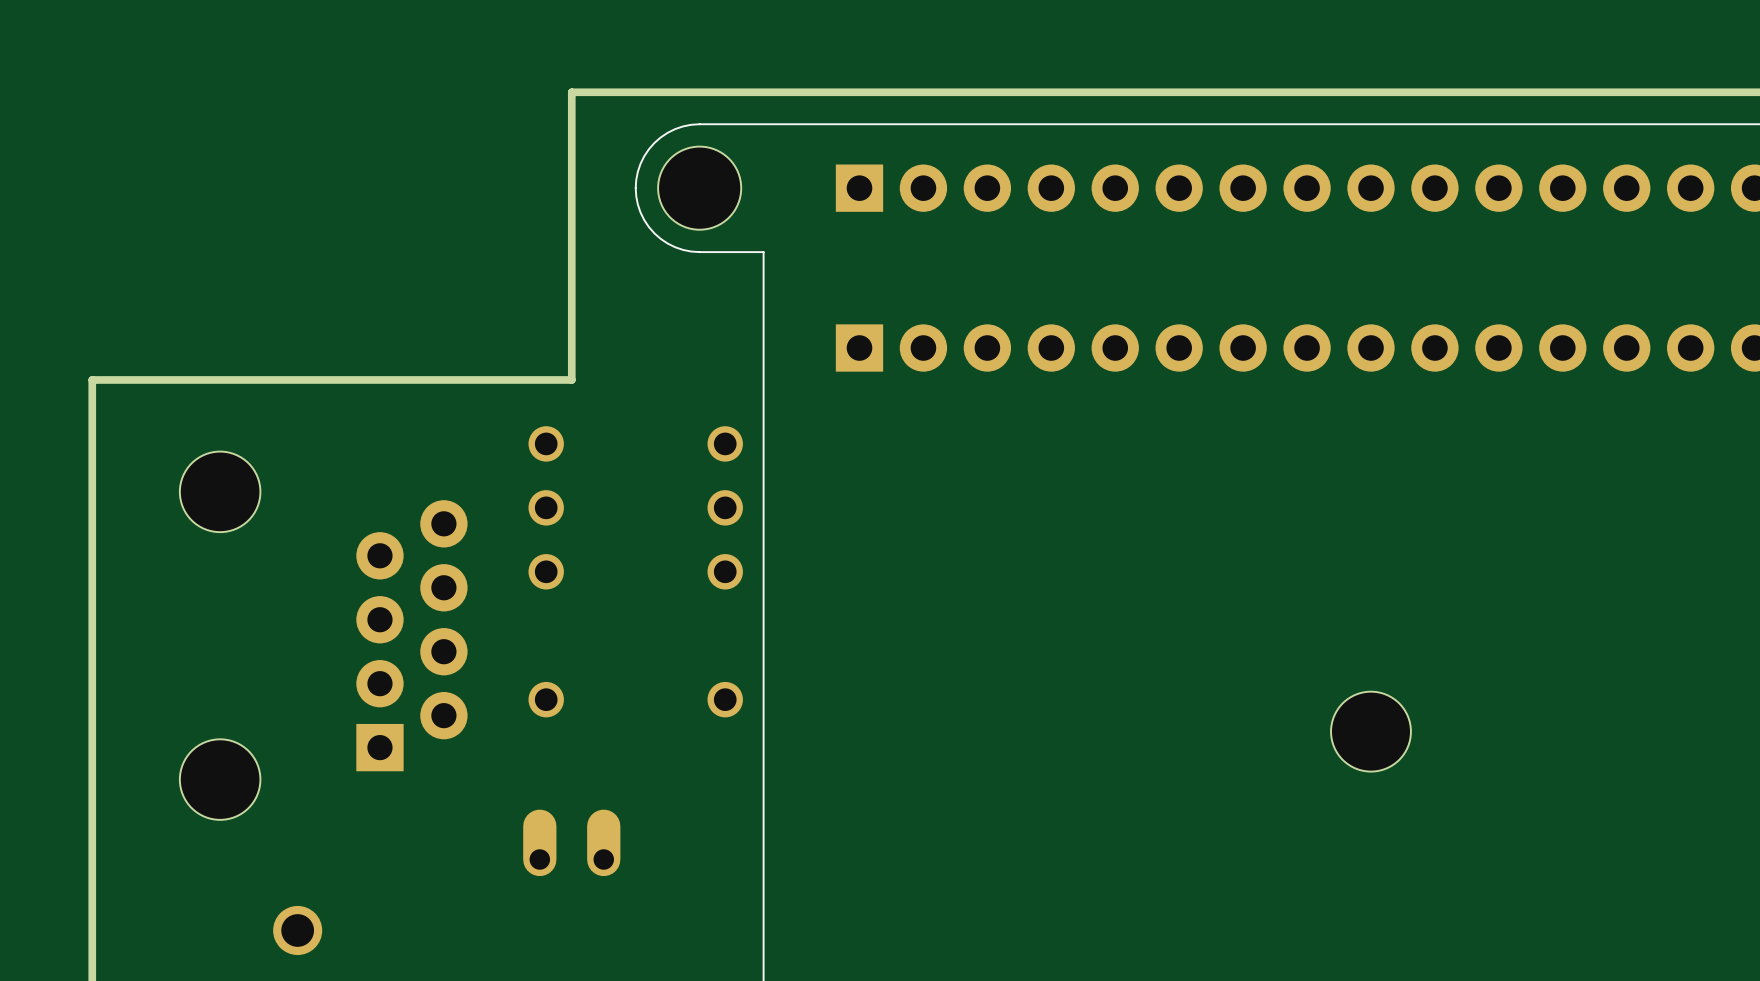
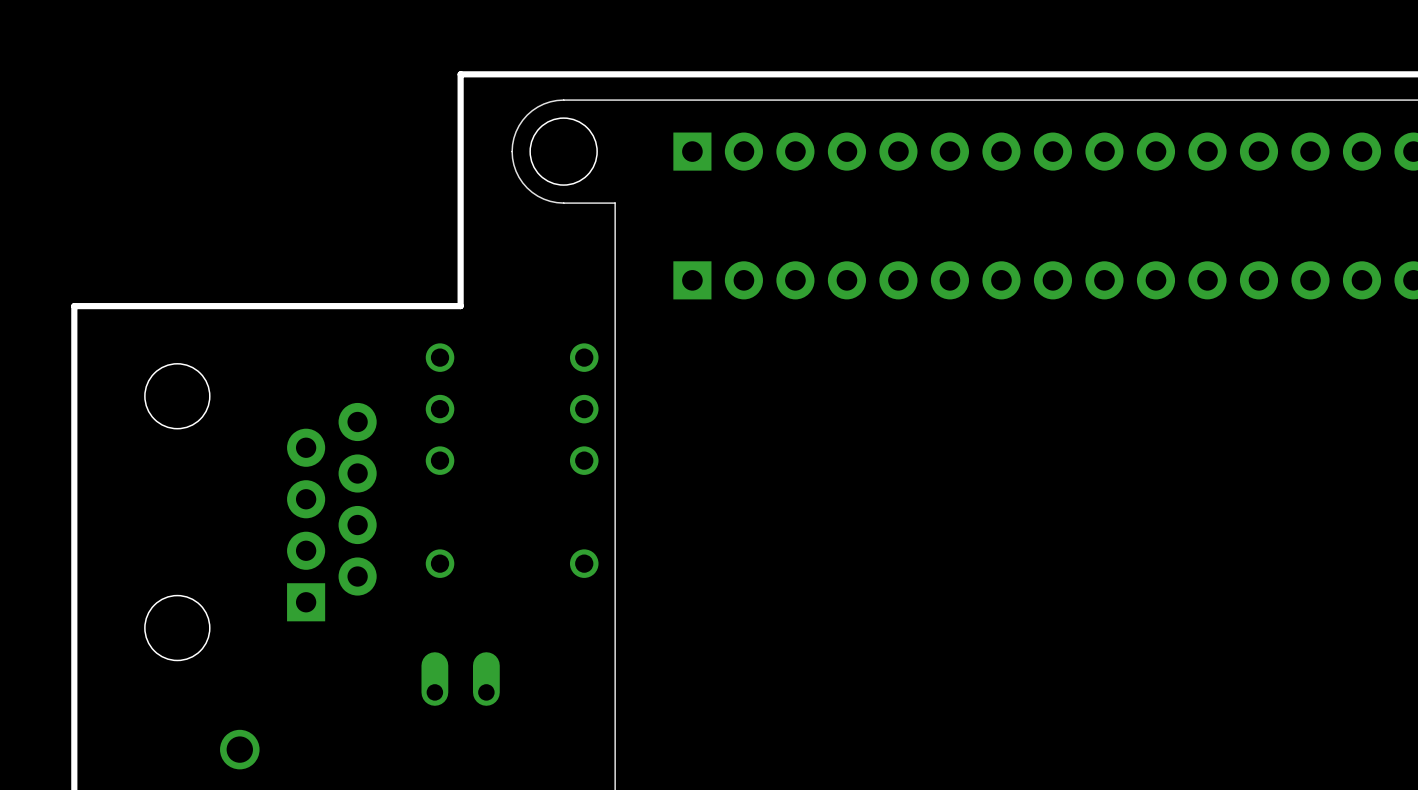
hole: (1370, 731) -> none

